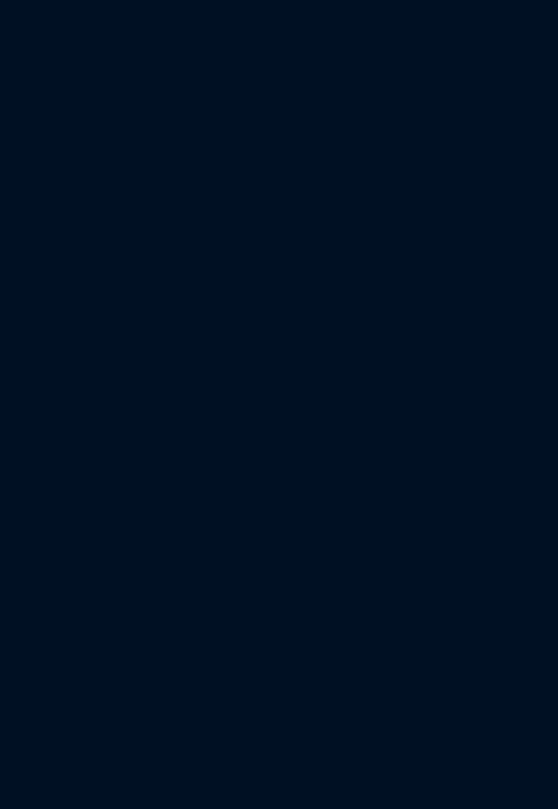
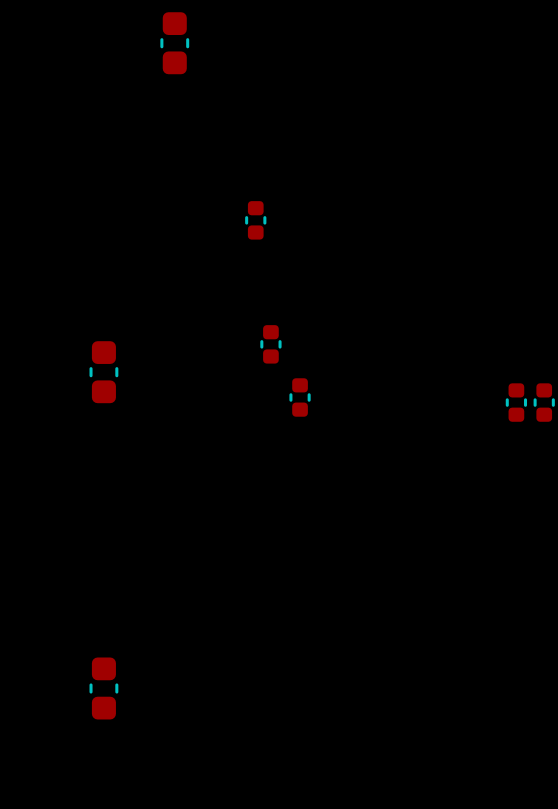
part: none -> (174, 43)
part: none -> (255, 220)
part: none -> (270, 344)
part: none -> (103, 372)
part: none -> (300, 397)
part: none -> (516, 402)
part: none -> (544, 402)
part: none -> (103, 688)

